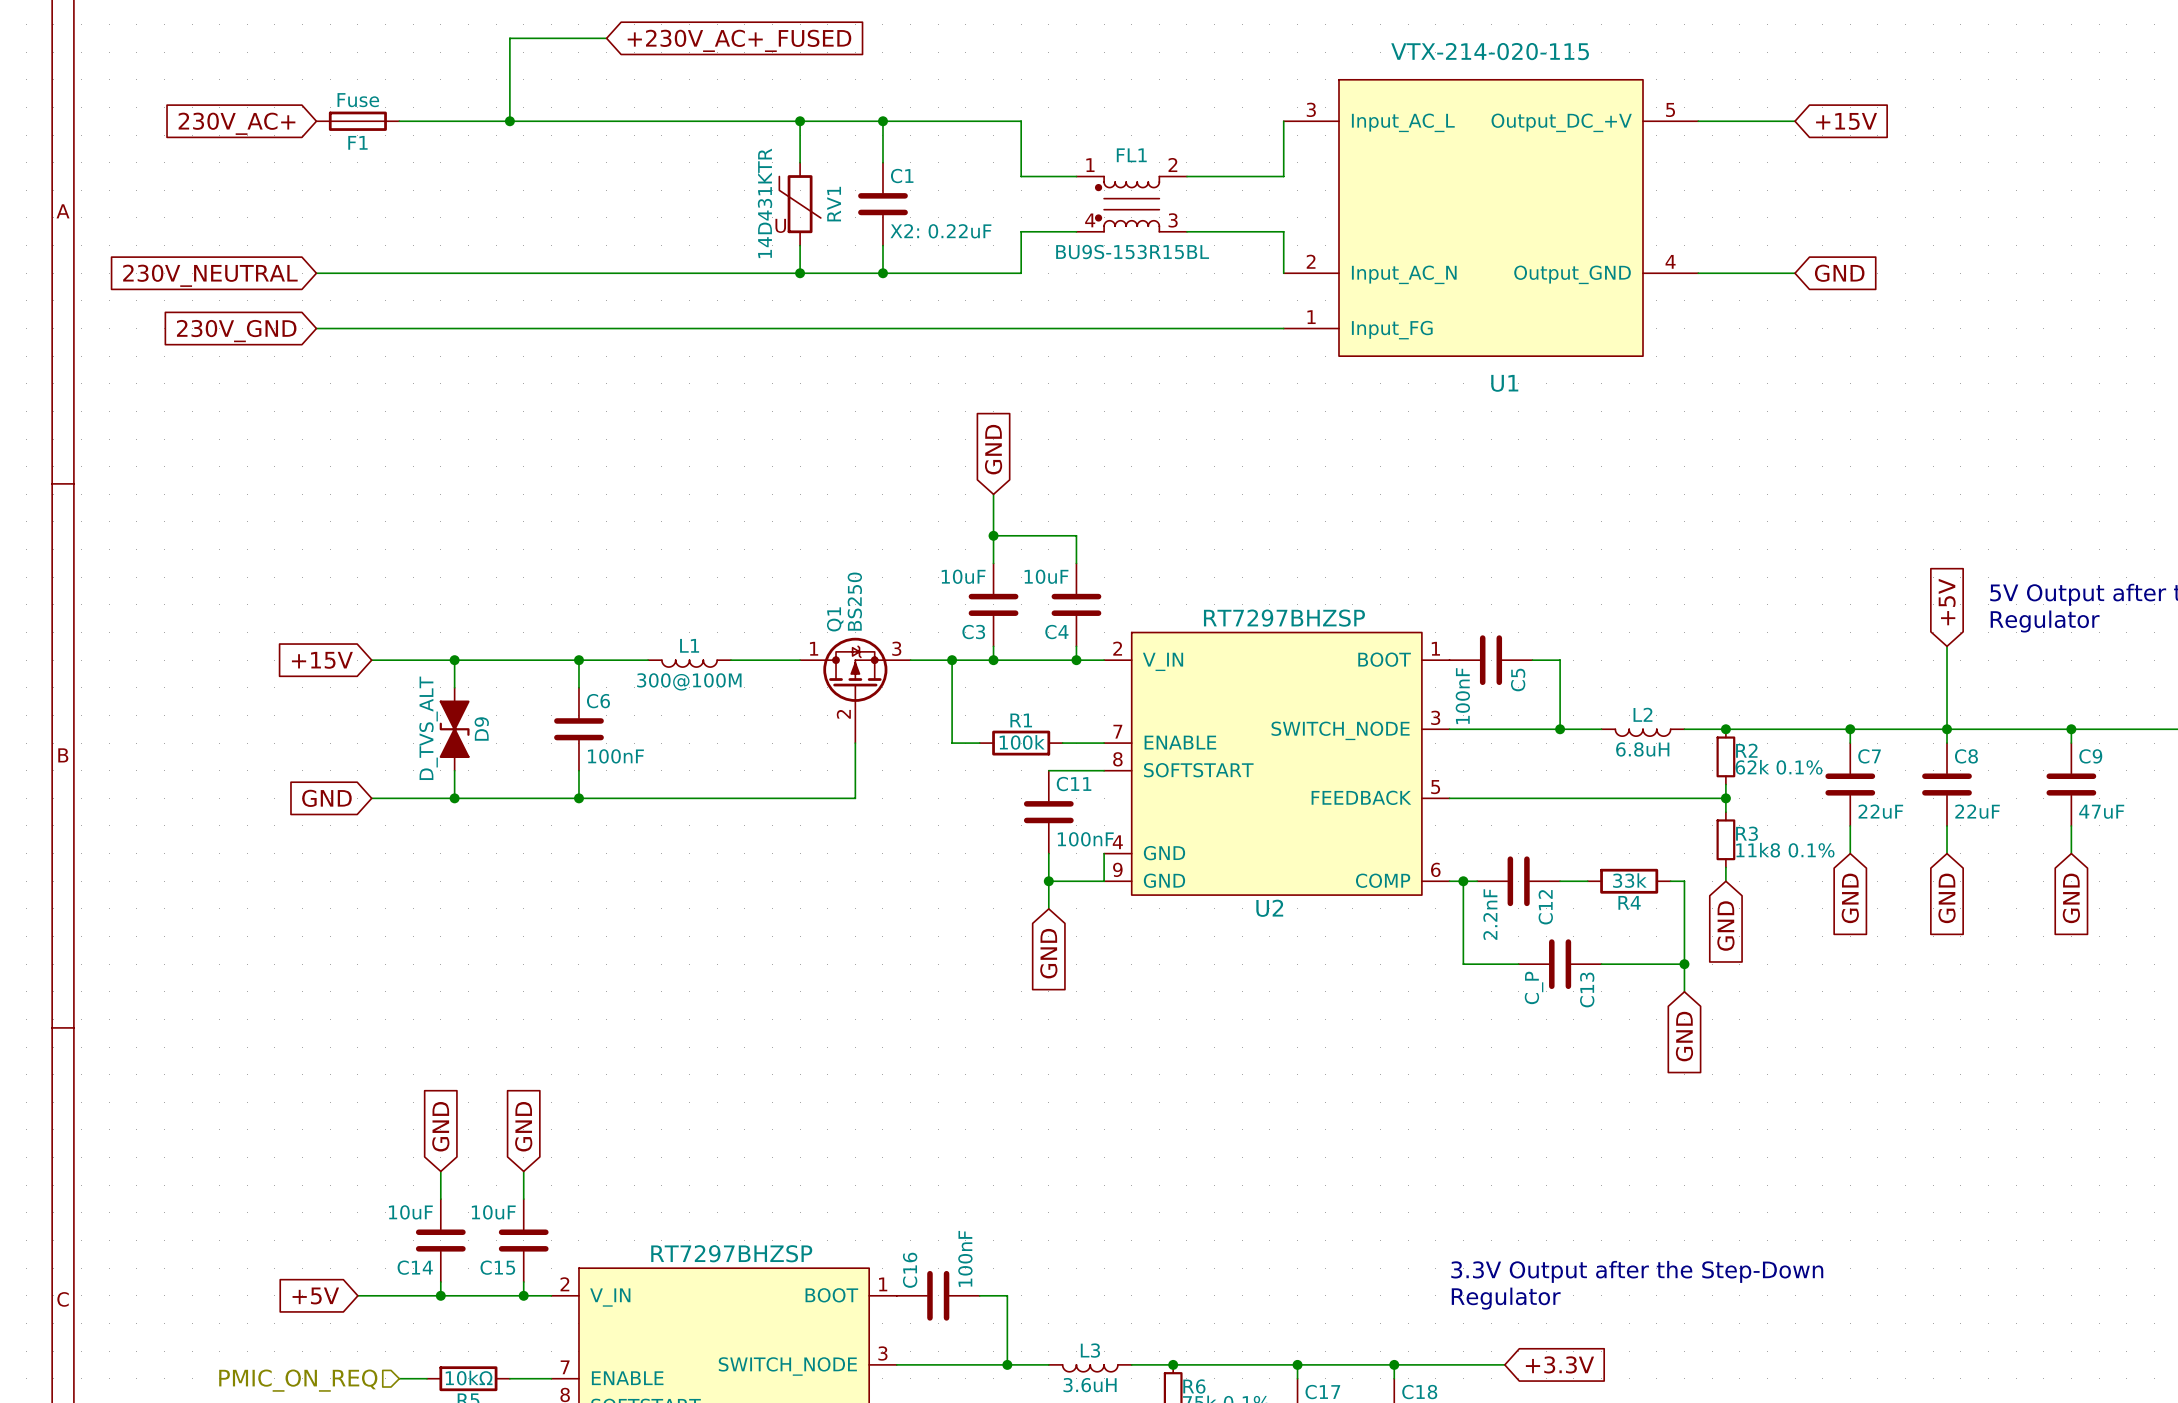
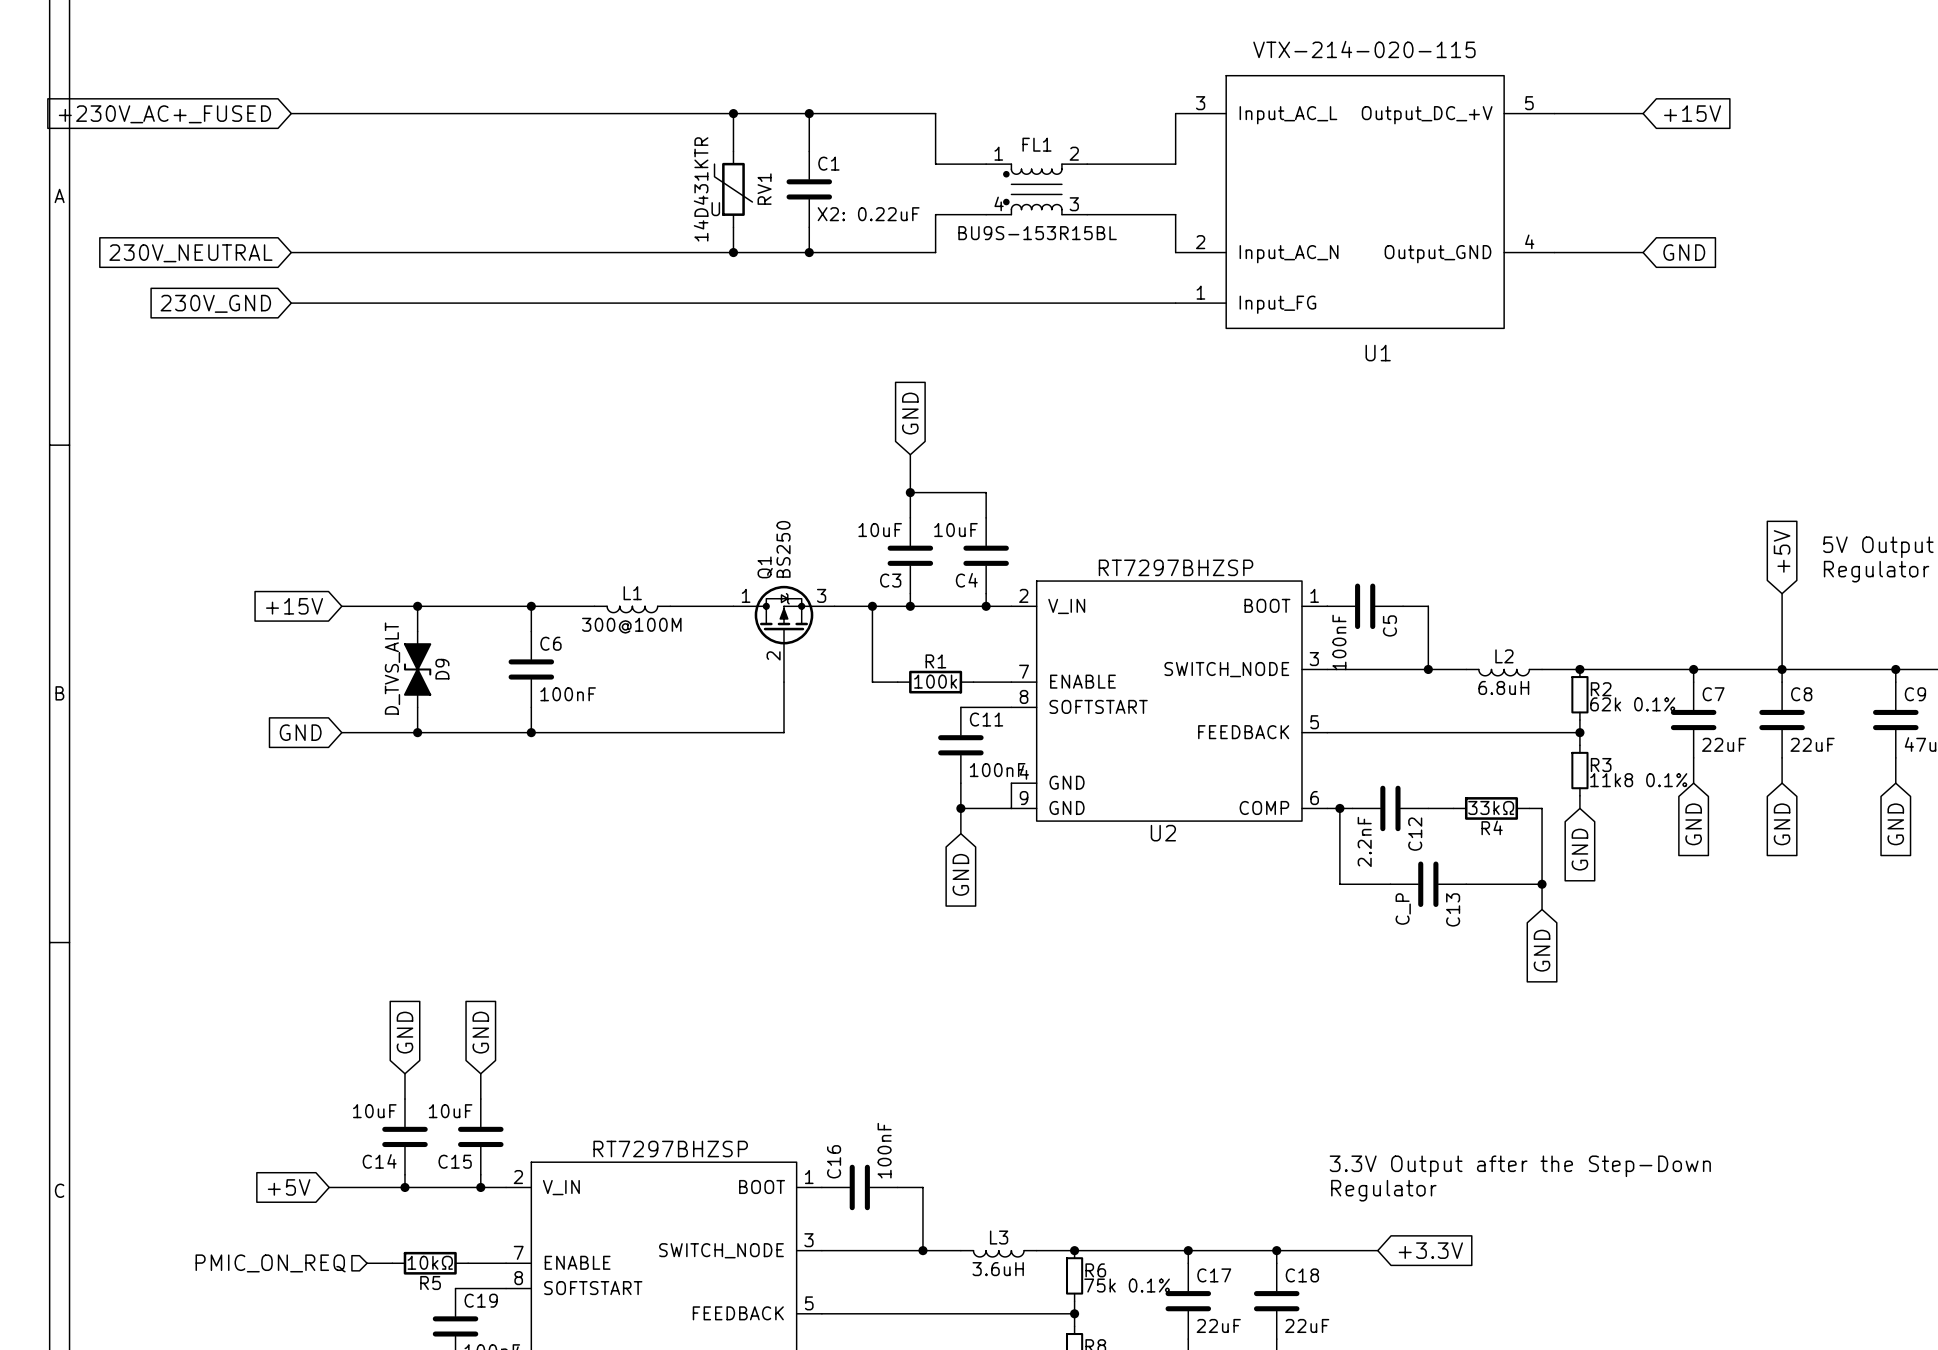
wire: (606, 38) (509, 38) (509, 121) -> none
global label: +230V_AC+_FUSED (739, 40) -> none
F1: Fuse (357, 121) -> none
junction: (509, 121) -> none
global label: 230V_AC+ (236, 123) -> +230V_AC+_FUSED (164, 114)
R4 value: 33k (1629, 880) -> 33kΩ (1491, 807)

